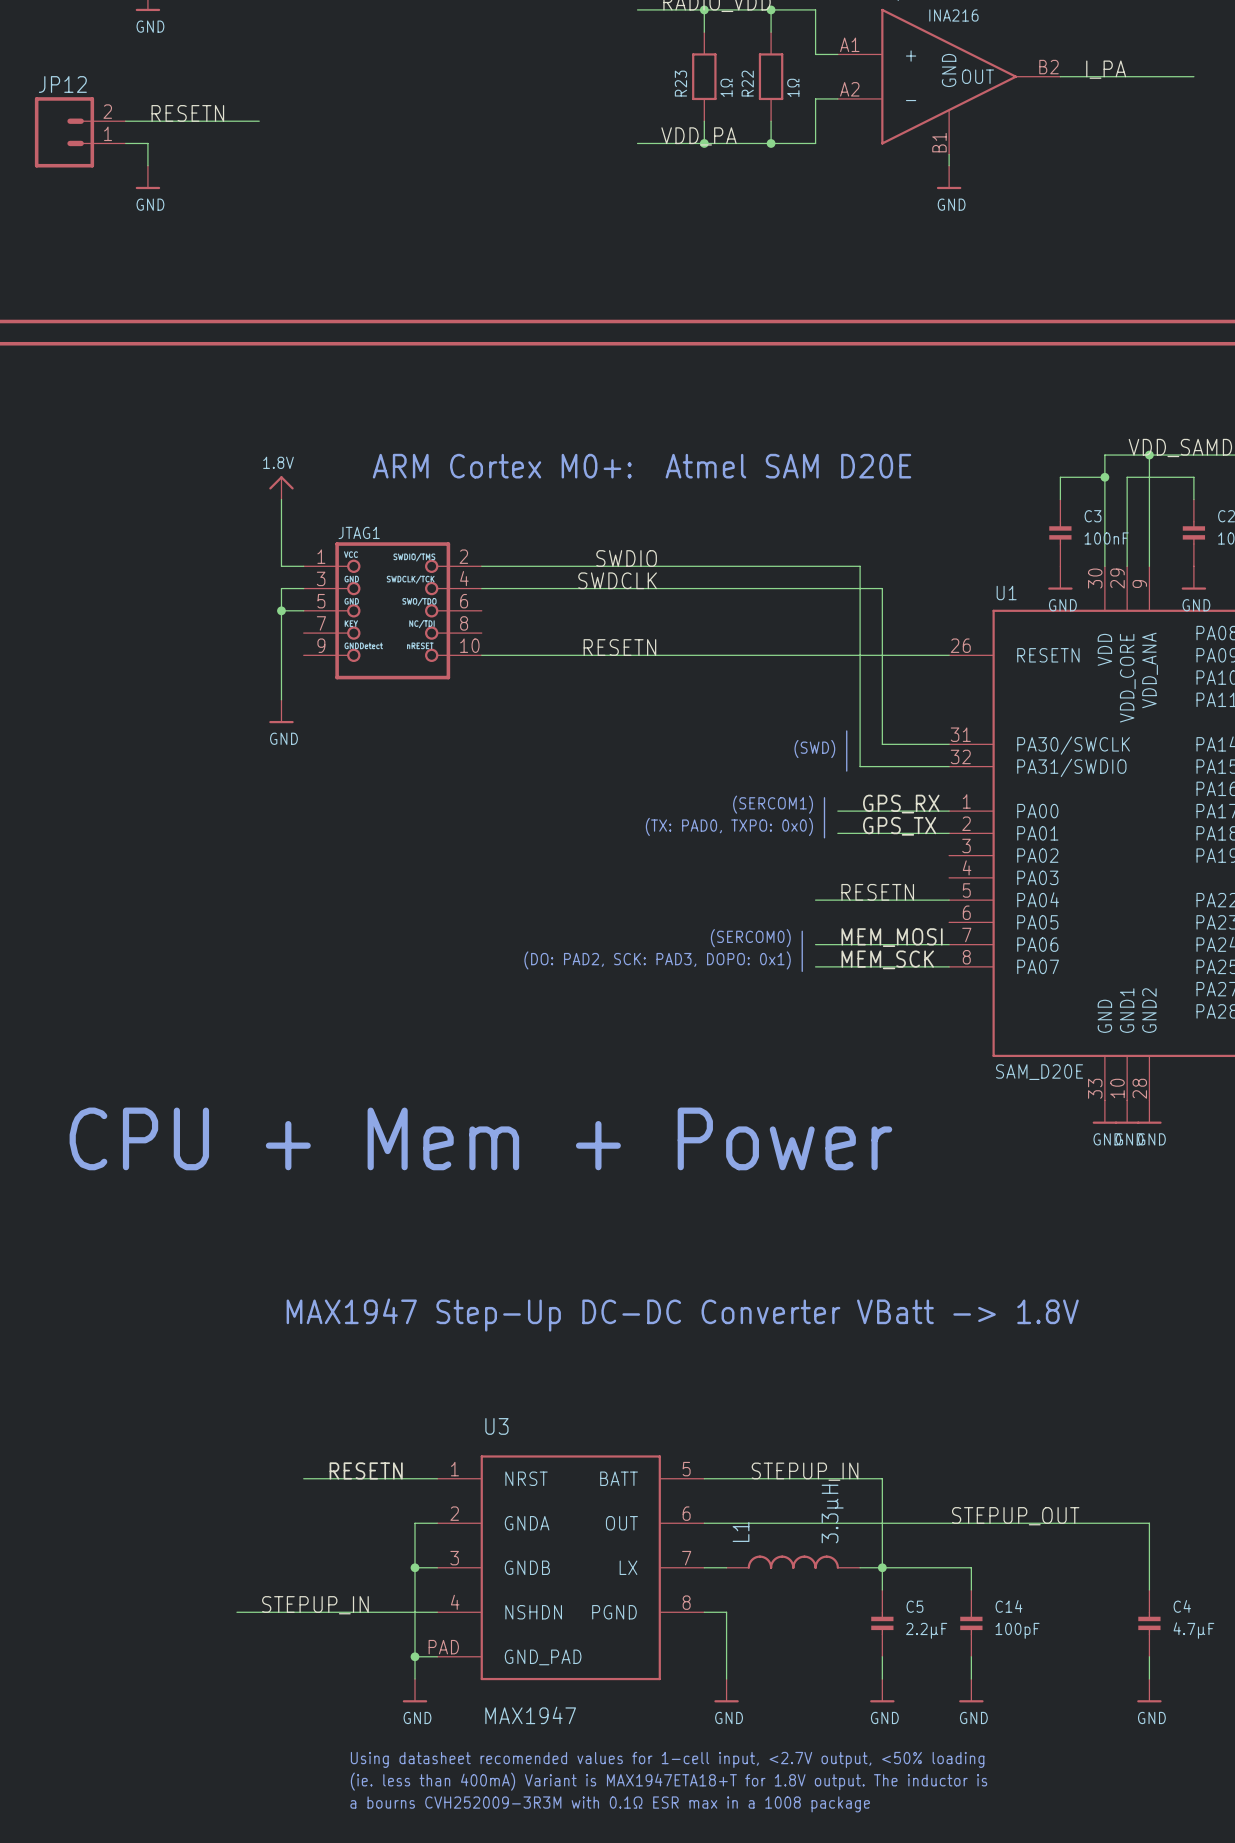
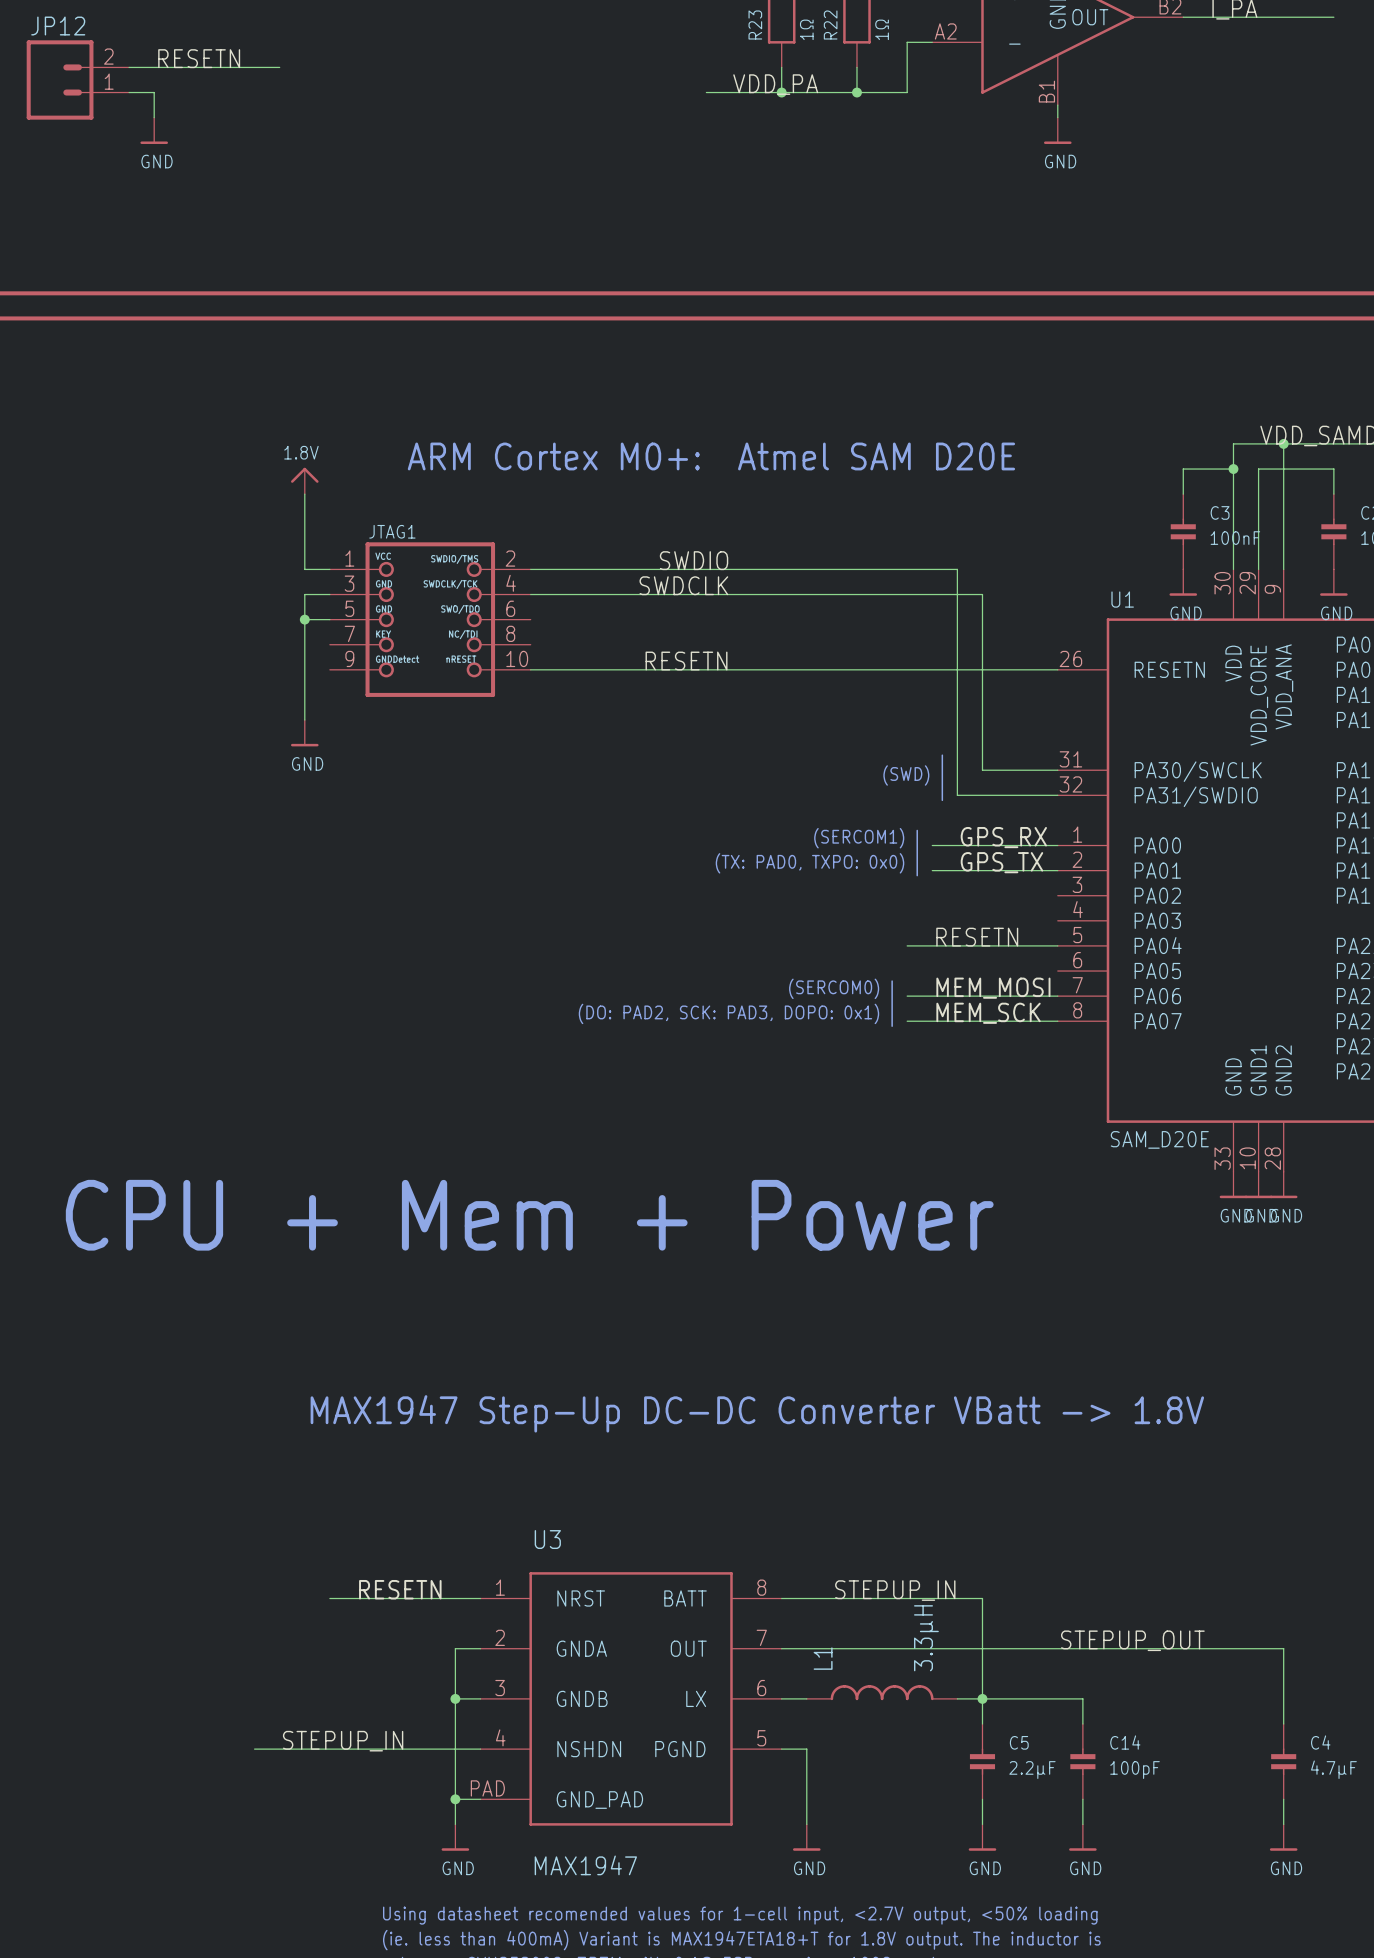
U3 pin number: 5 (686, 1469) -> 8 (761, 1587)
U3 pin number: 6 (686, 1513) -> 7 (761, 1637)
U3 pin number: 7 (686, 1558) -> 6 (761, 1688)
U3 pin number: 8 (686, 1602) -> 5 (761, 1738)

